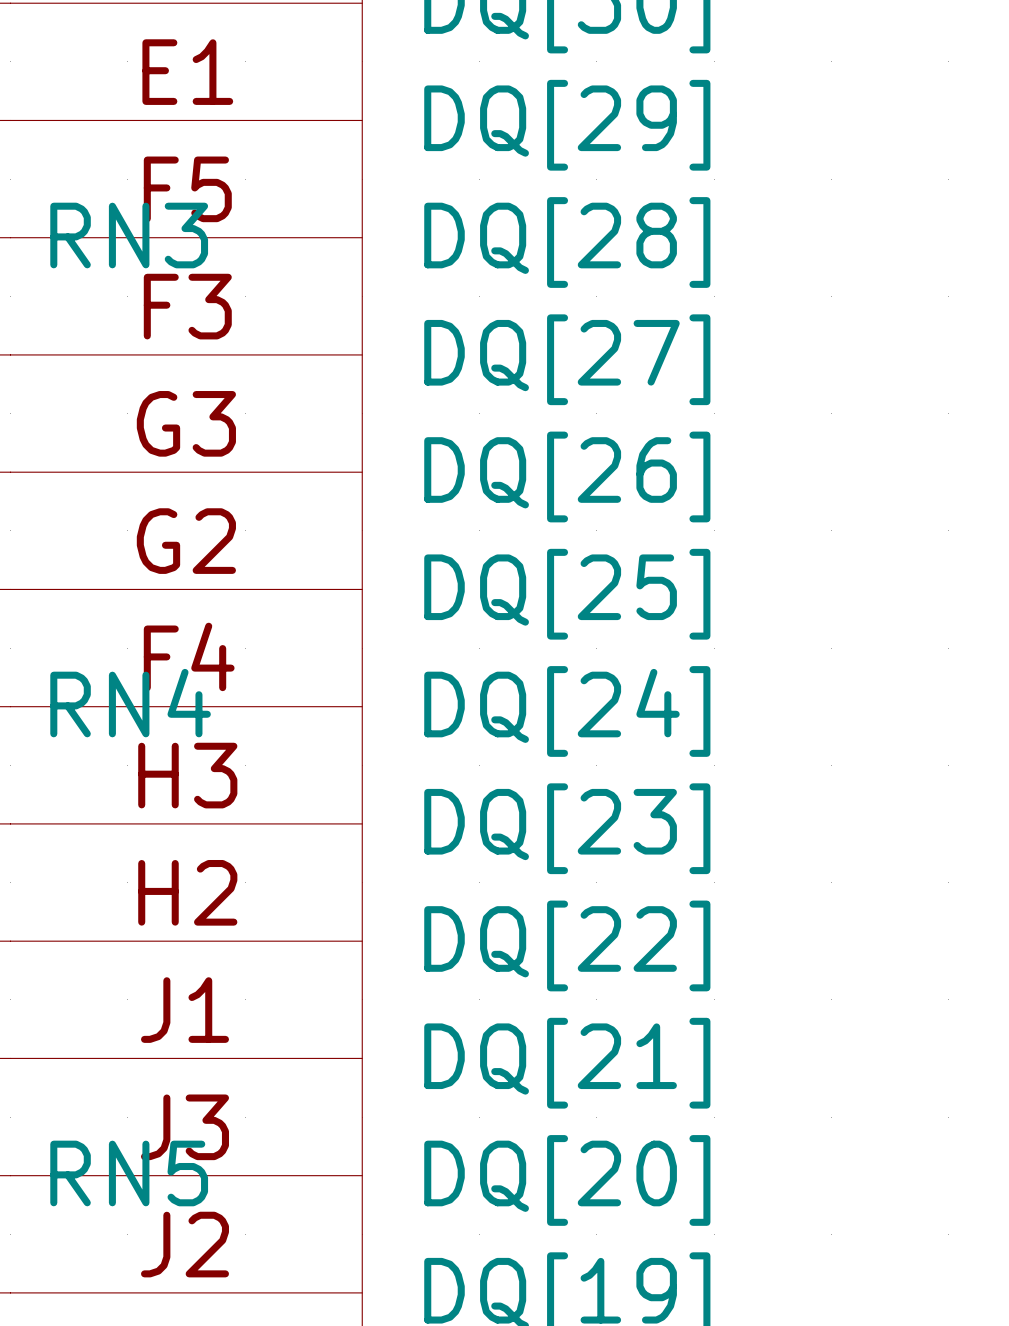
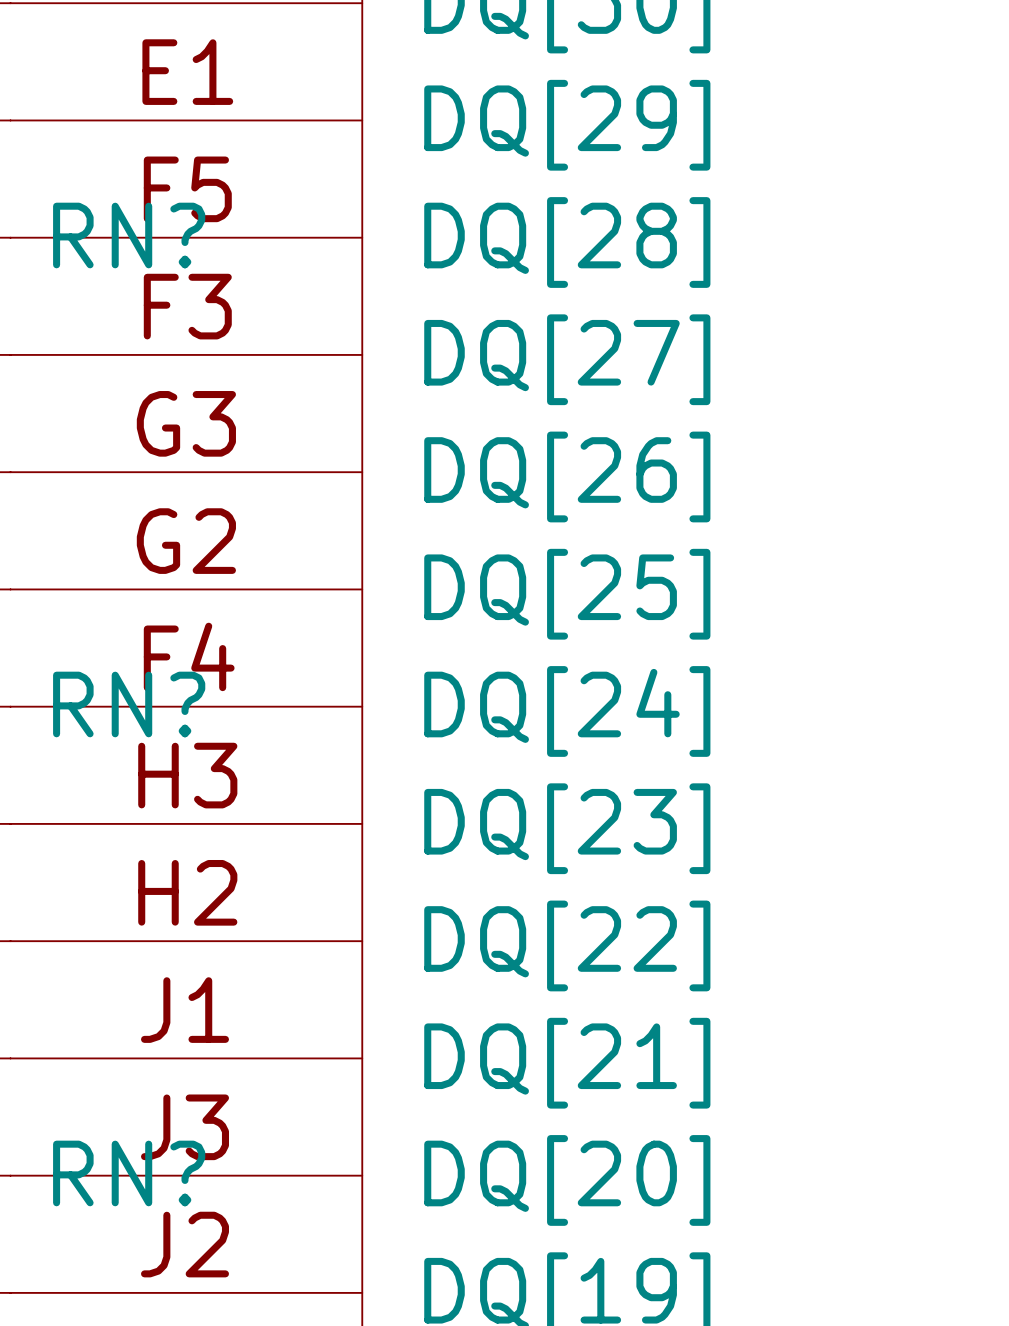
RN3 name: RN3 (129, 235) -> RN? (129, 235)
RN4 name: RN4 (130, 703) -> RN? (129, 704)
RN5 name: RN5 (129, 1173) -> RN? (129, 1173)

